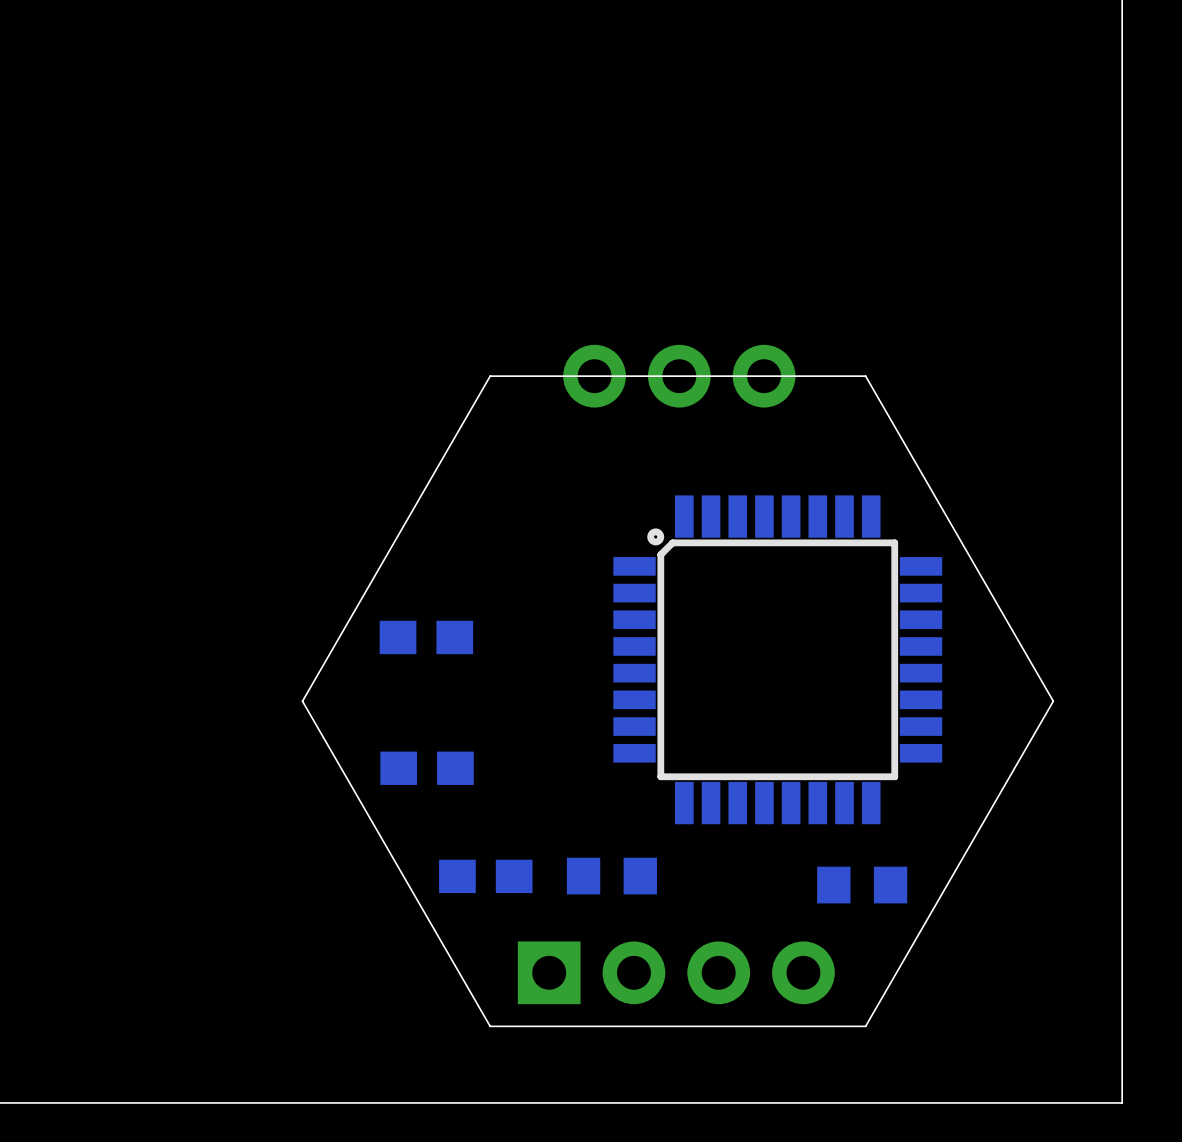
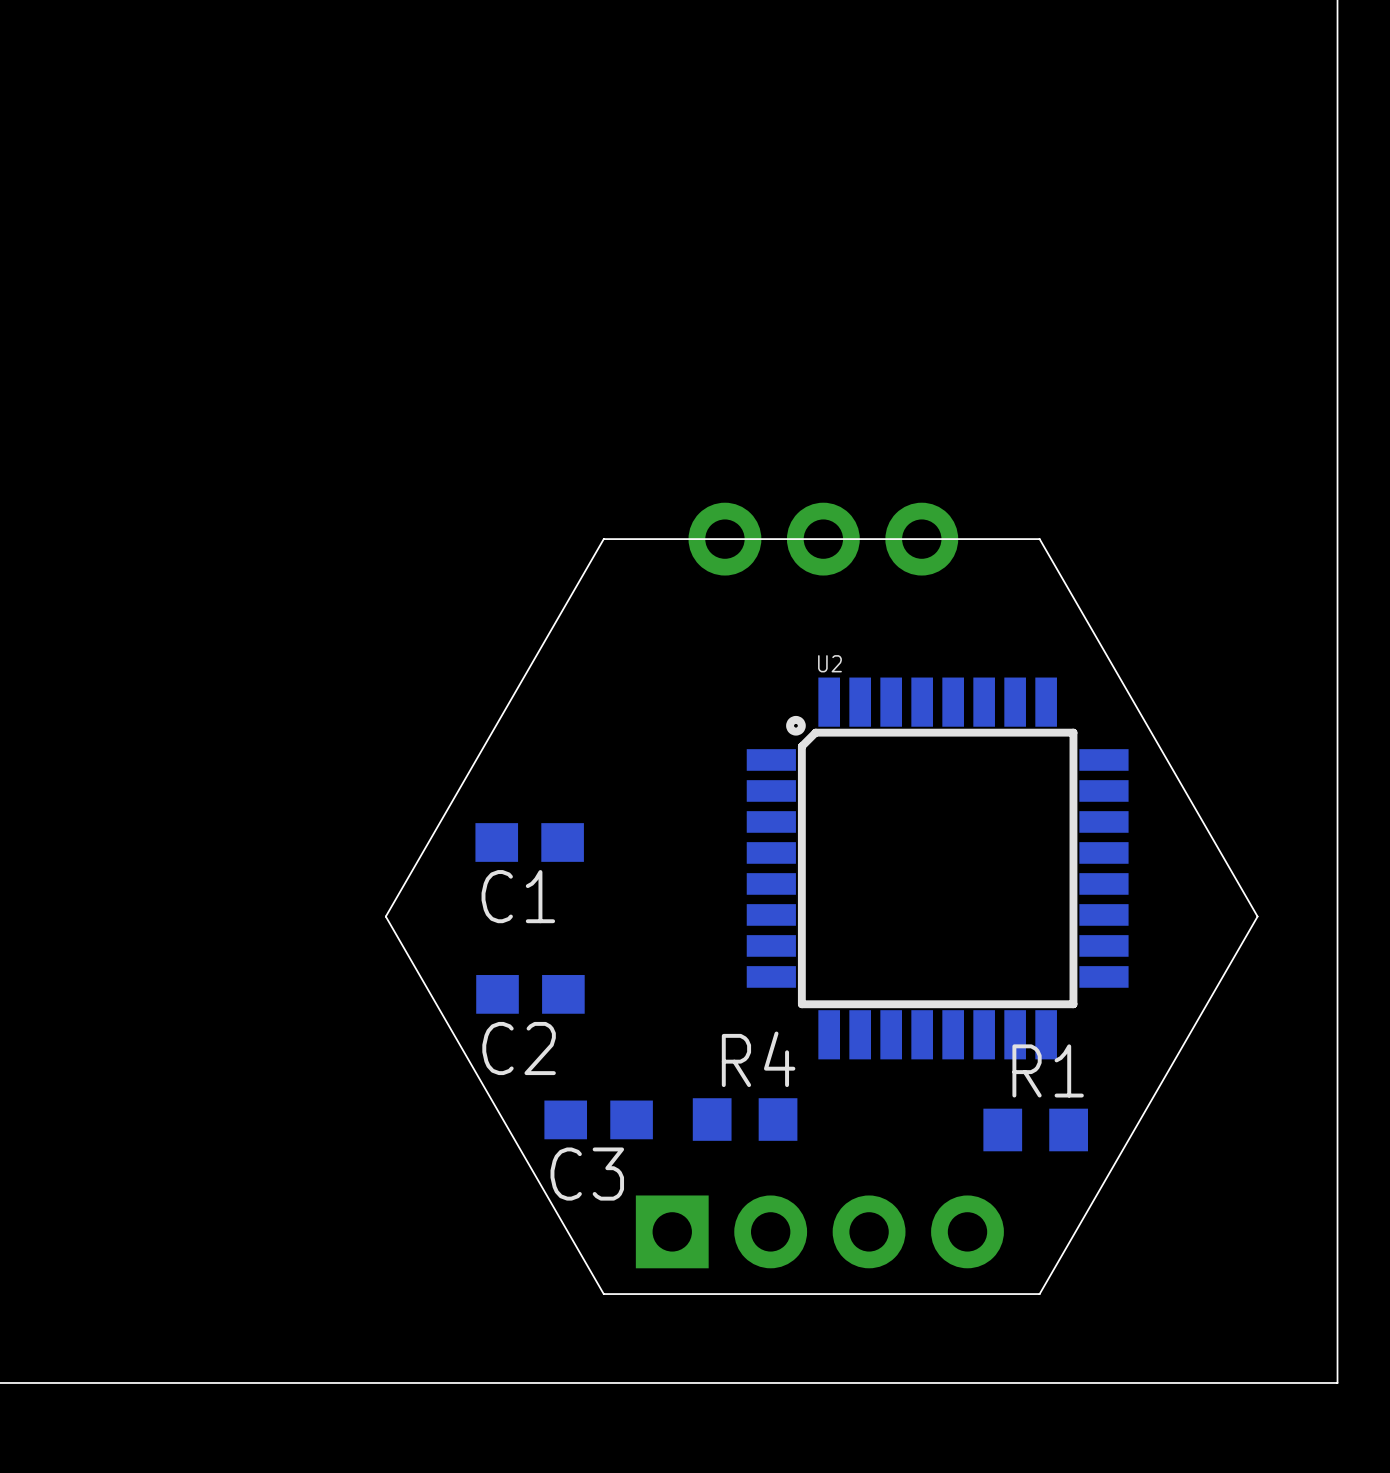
U2 name: none -> U2 (829, 663)
C1 name: none -> C1 (518, 896)
C2 name: none -> C2 (519, 1048)
R4 name: none -> R4 (758, 1059)
R1 name: none -> R1 (1048, 1070)
C3 name: none -> C3 (587, 1174)

